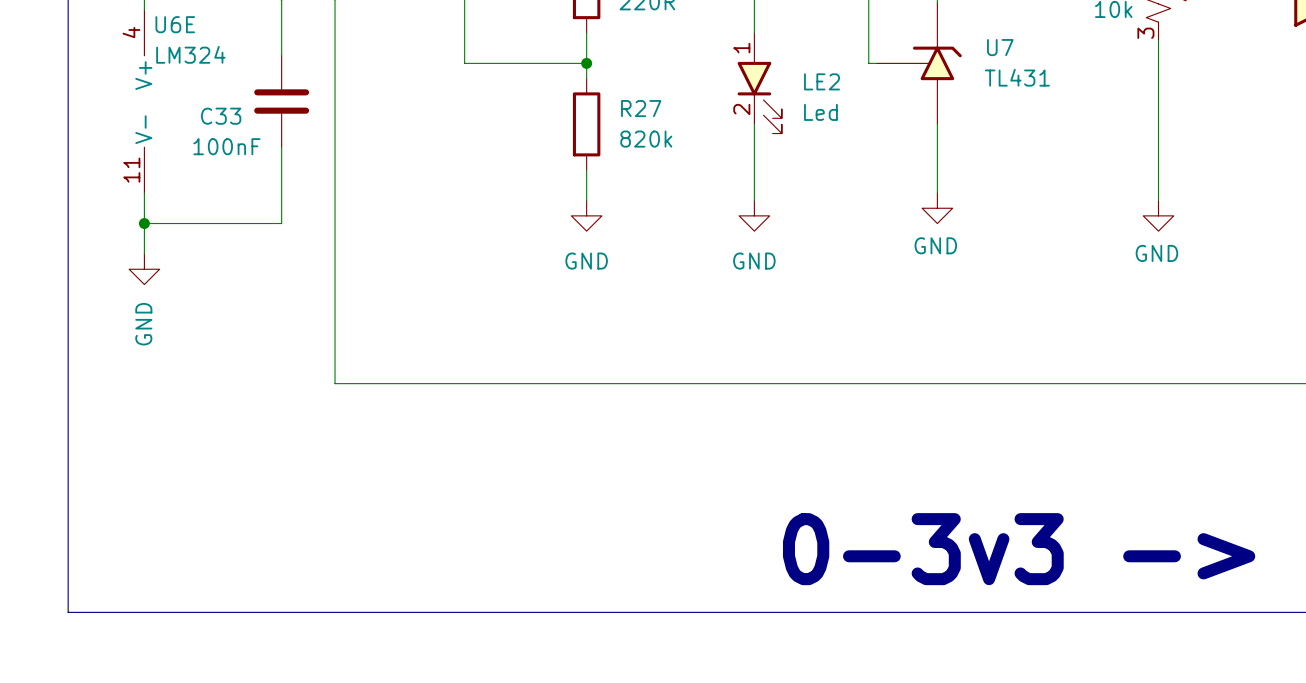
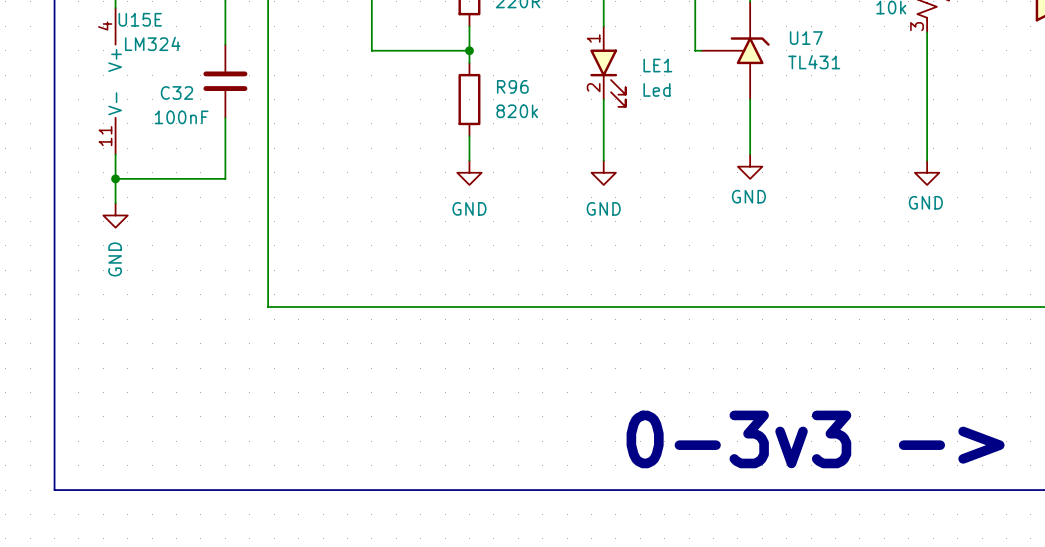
U6E name: U6E (175, 24) -> U15E (140, 19)
U7 name: U7 (1000, 47) -> U17 (806, 38)
LE2 name: LE2 (822, 81) -> LE1 (657, 65)
R27 name: R27 (641, 108) -> R96 (512, 86)
C33 name: C33 (221, 116) -> C32 (176, 92)

